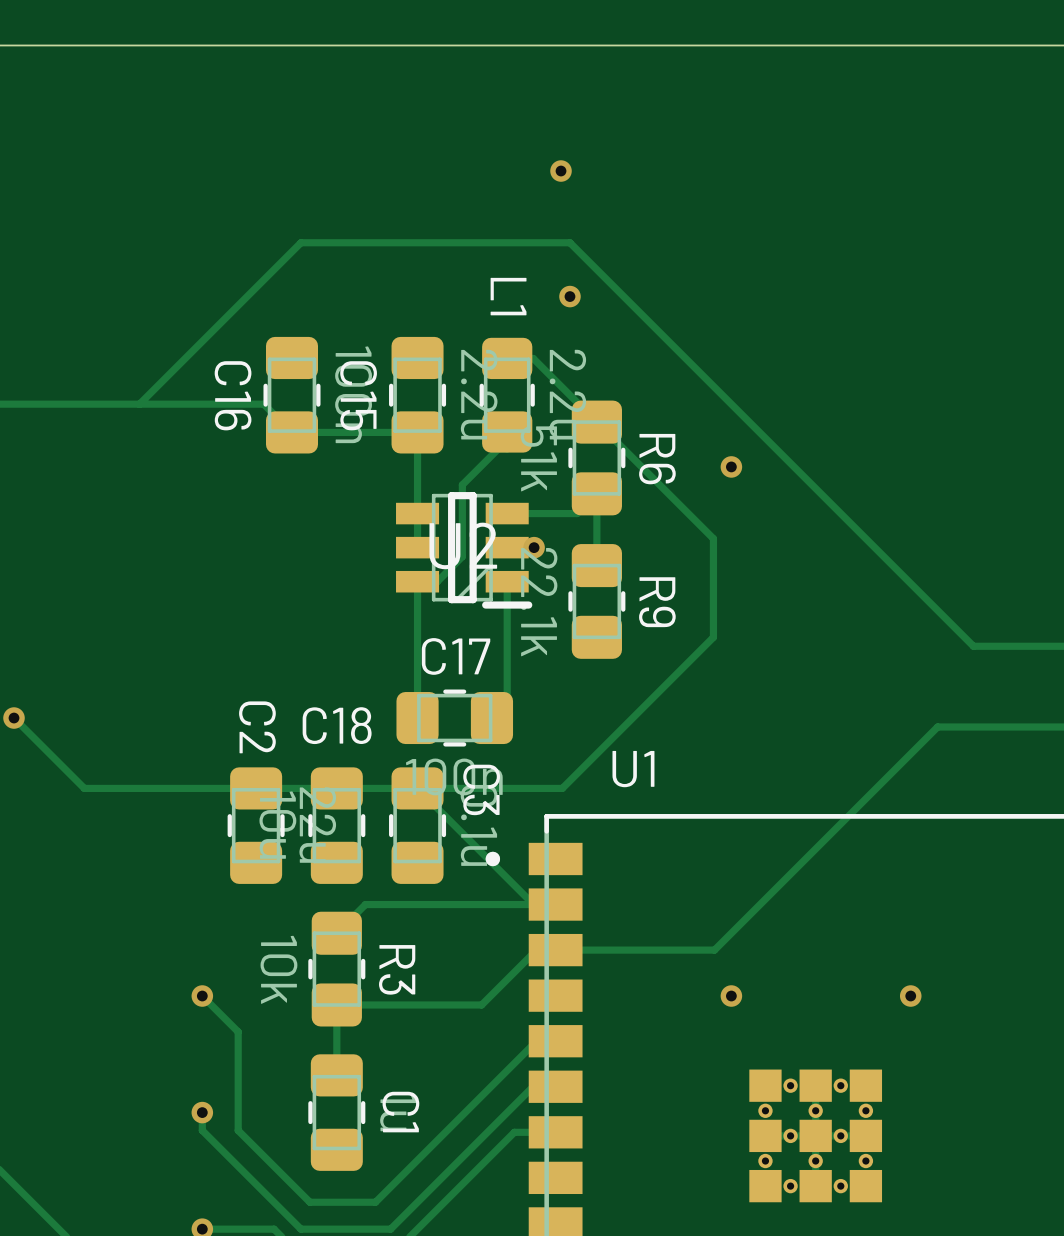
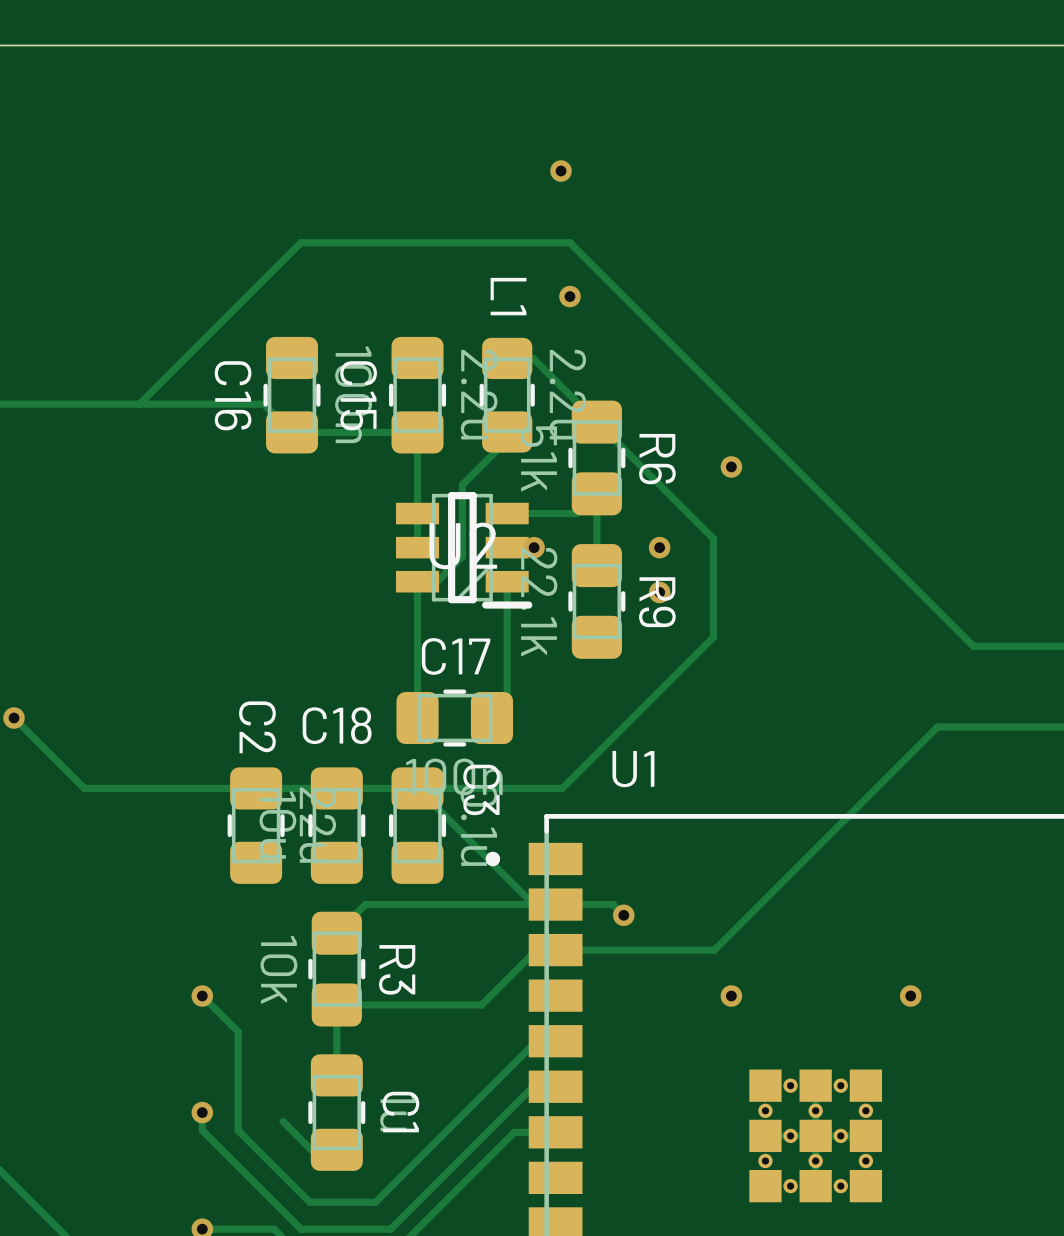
via: none -> (659, 547)
via: none -> (659, 592)
track: none -> (555, 904) (613, 904) (623, 915)
via: none -> (623, 915)
track: none -> (283, 1121) (311, 1149) (336, 1149)

